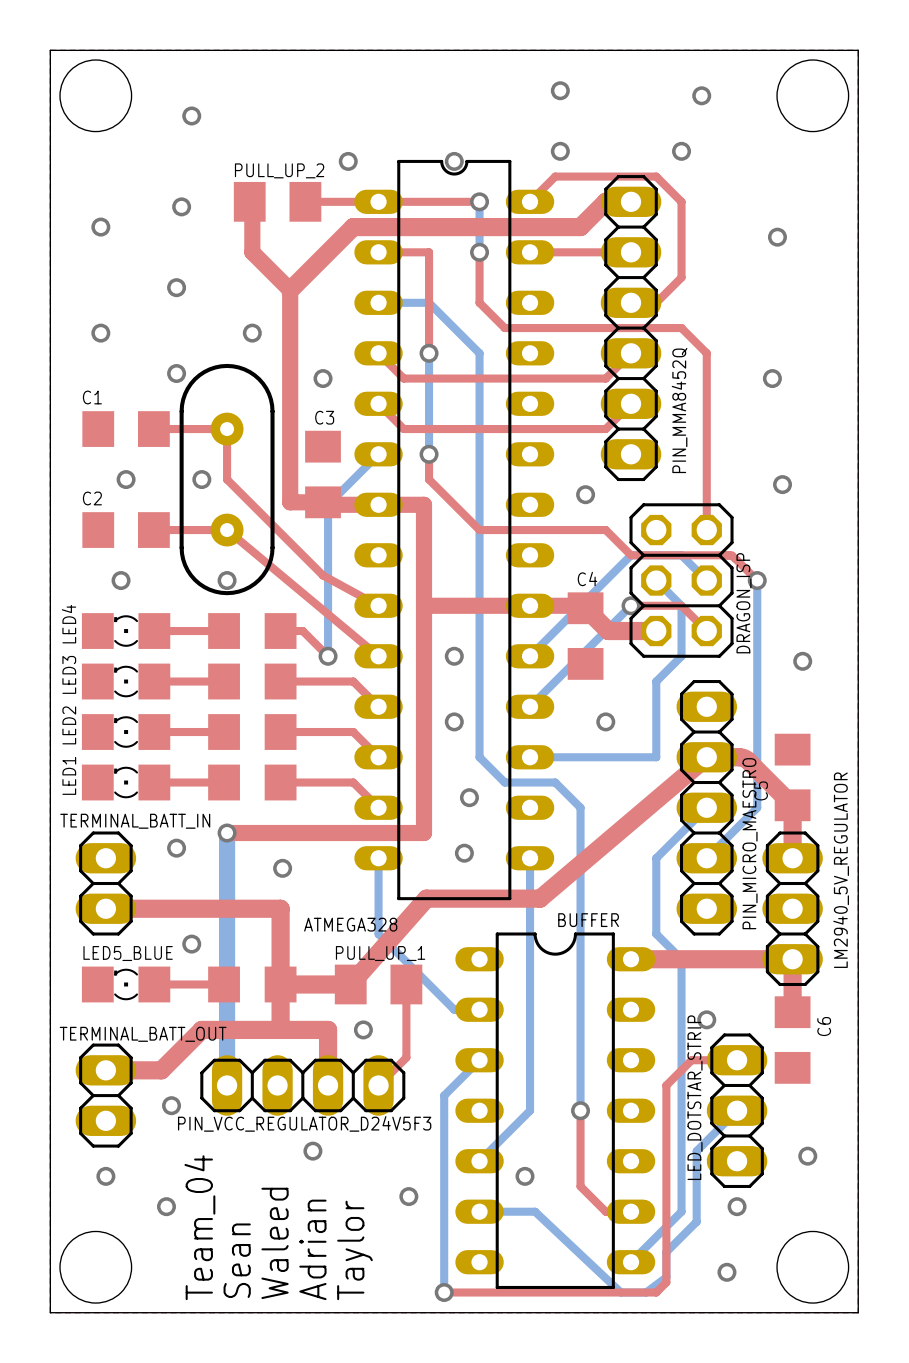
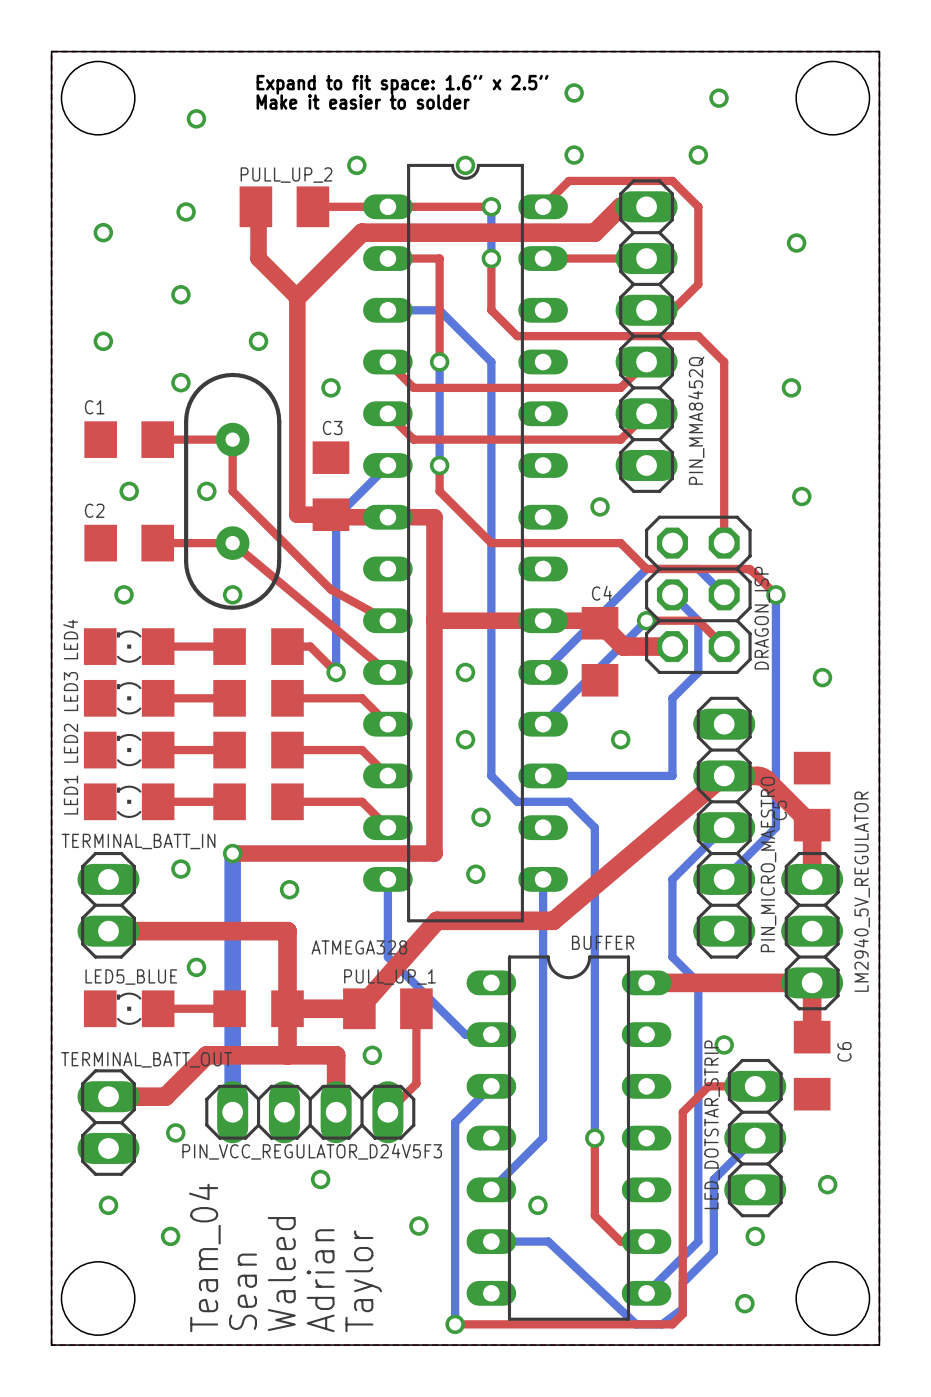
text: none -> Expand to fit space: 1.6'' x 2.5'' (402, 84)
text: none -> Make it easier to solder (363, 102)

